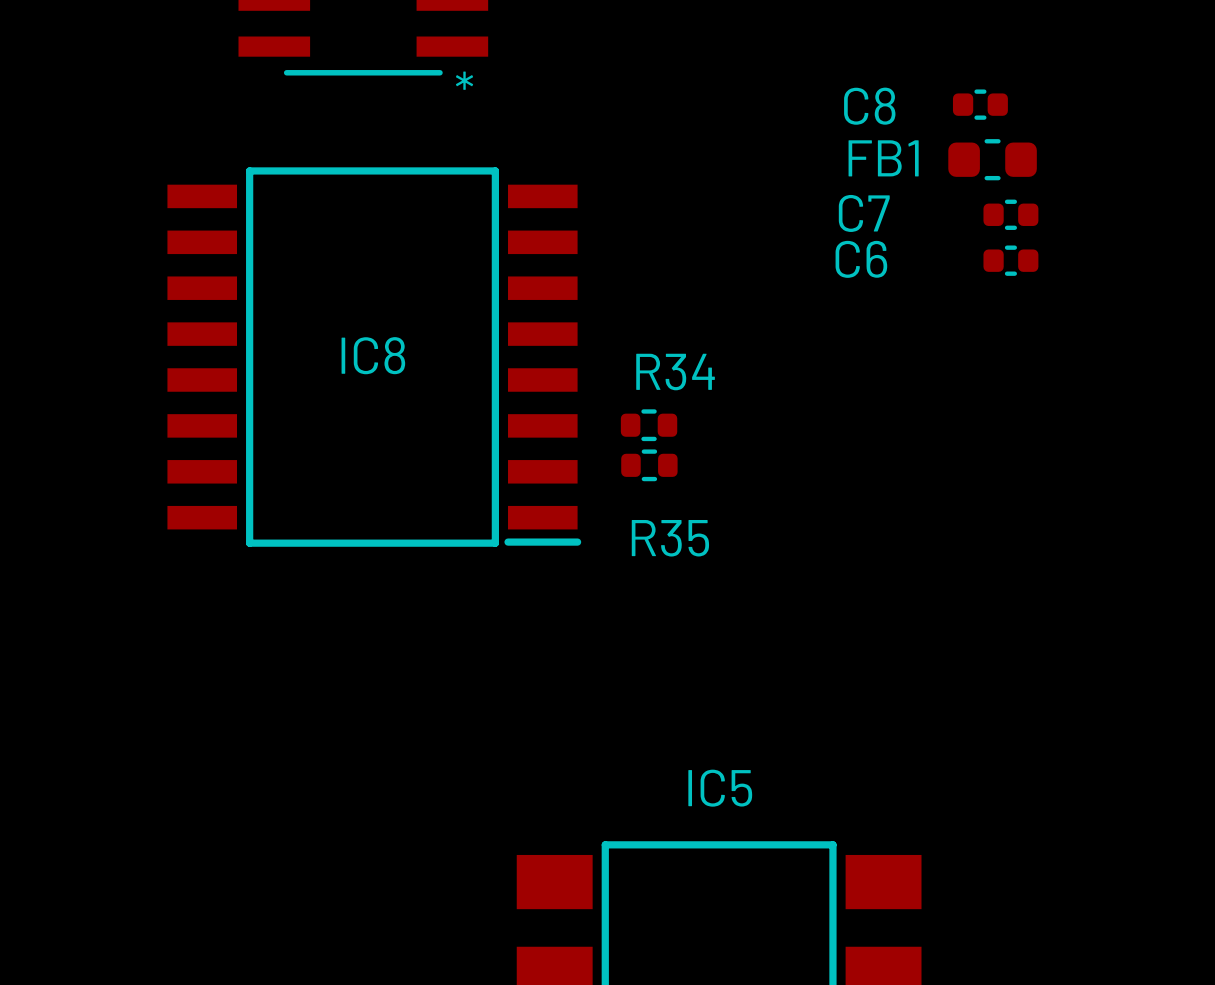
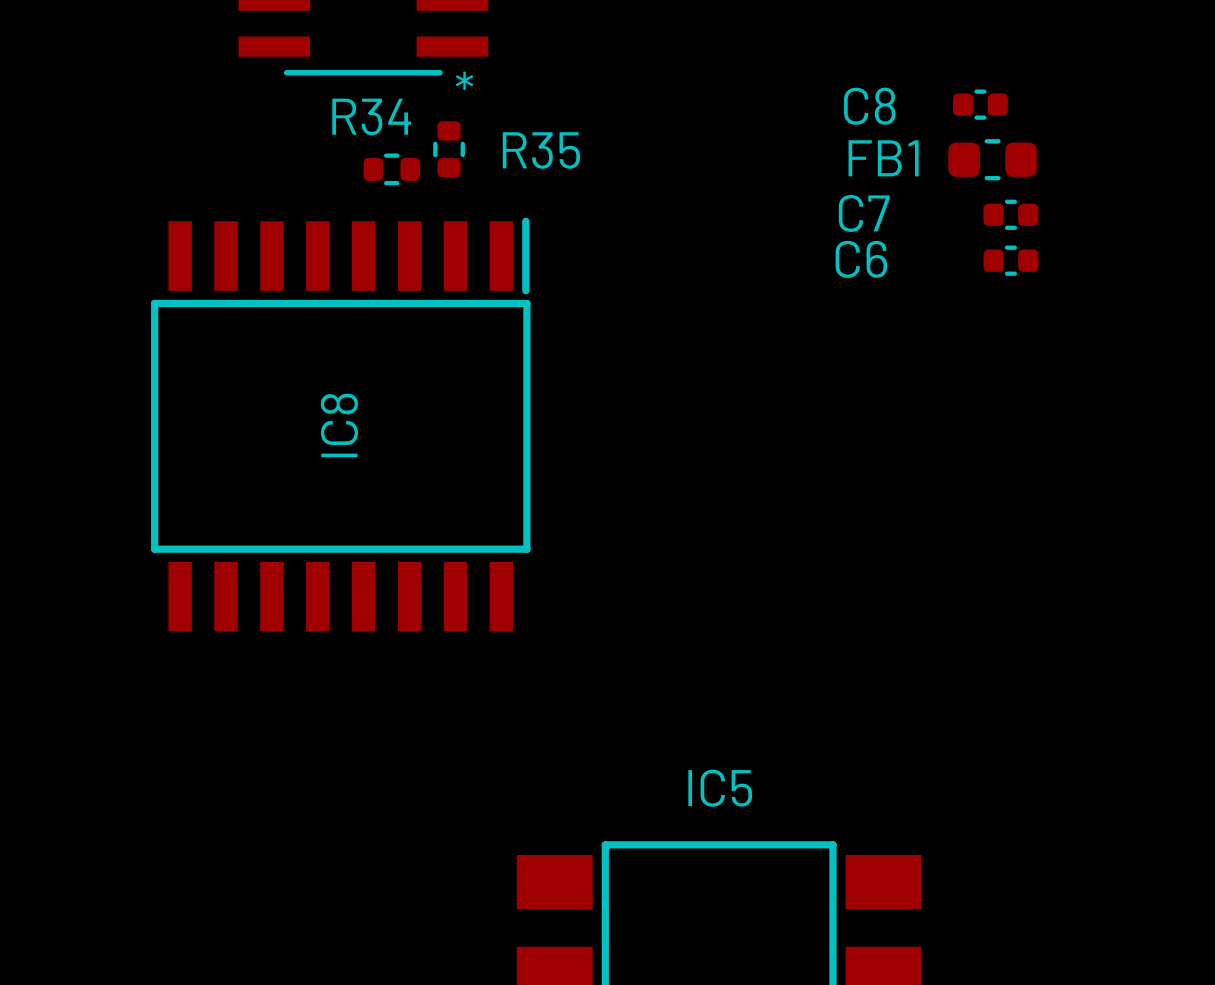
IC8 rotation: 0° (374, 357) -> 90° counterclockwise (340, 424)
R34 name position: R34 (675, 372) -> R34 (371, 116)
R34 position: (649, 425) -> (391, 169)
R35 rotation: 0° (649, 465) -> 90° clockwise (449, 149)
R35 position: (649, 465) -> (449, 149)
R35 name position: R35 (670, 538) -> R35 (541, 150)

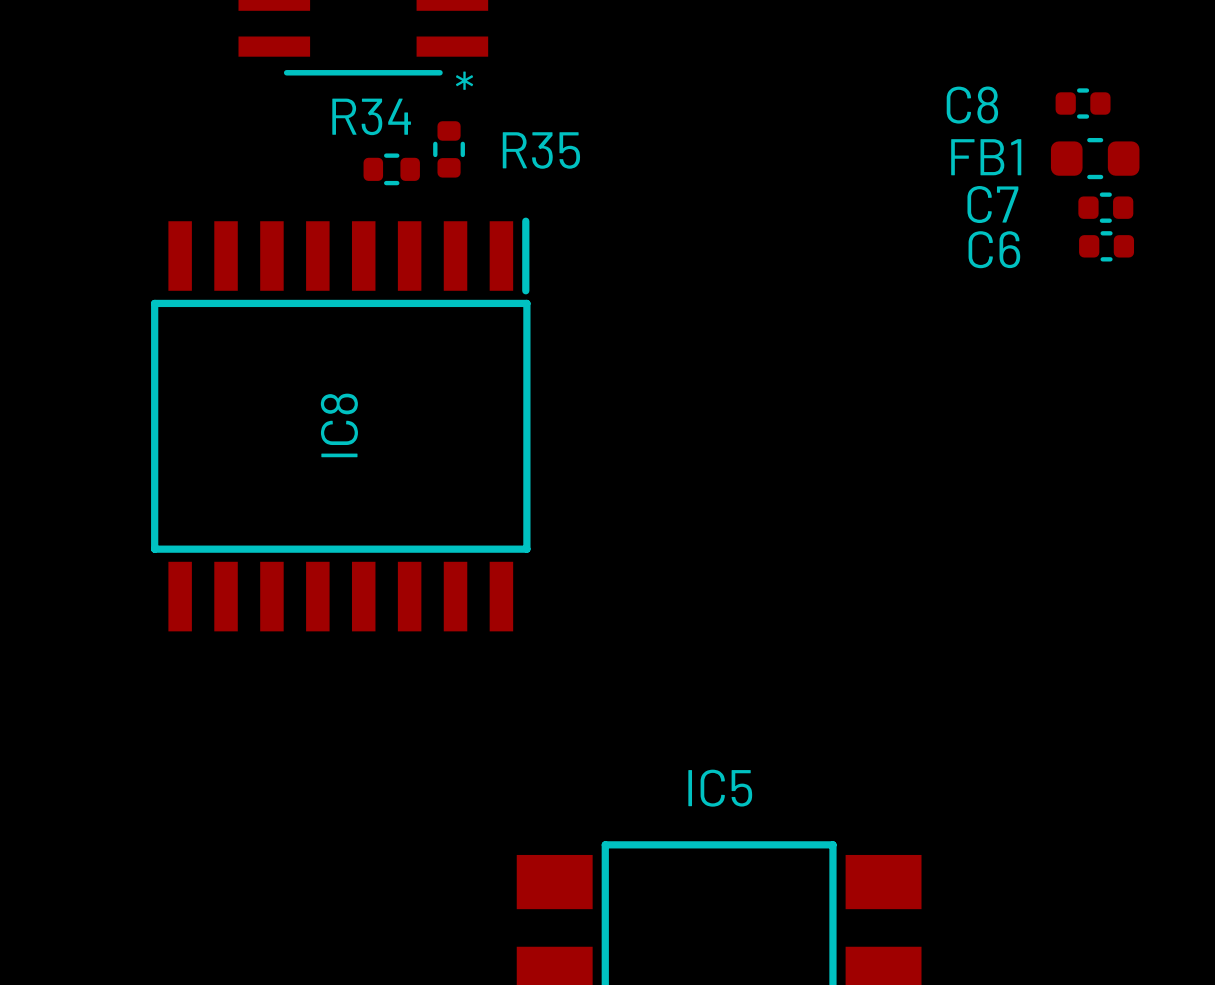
C8 position: (980, 104) -> (1083, 103)
FB1 position: (992, 159) -> (1095, 158)
C7 name position: C7 (864, 213) -> C7 (992, 204)
C7 position: (1010, 214) -> (1105, 207)
C6 name position: C6 (861, 259) -> C6 (994, 249)
C6 position: (1010, 260) -> (1106, 246)

